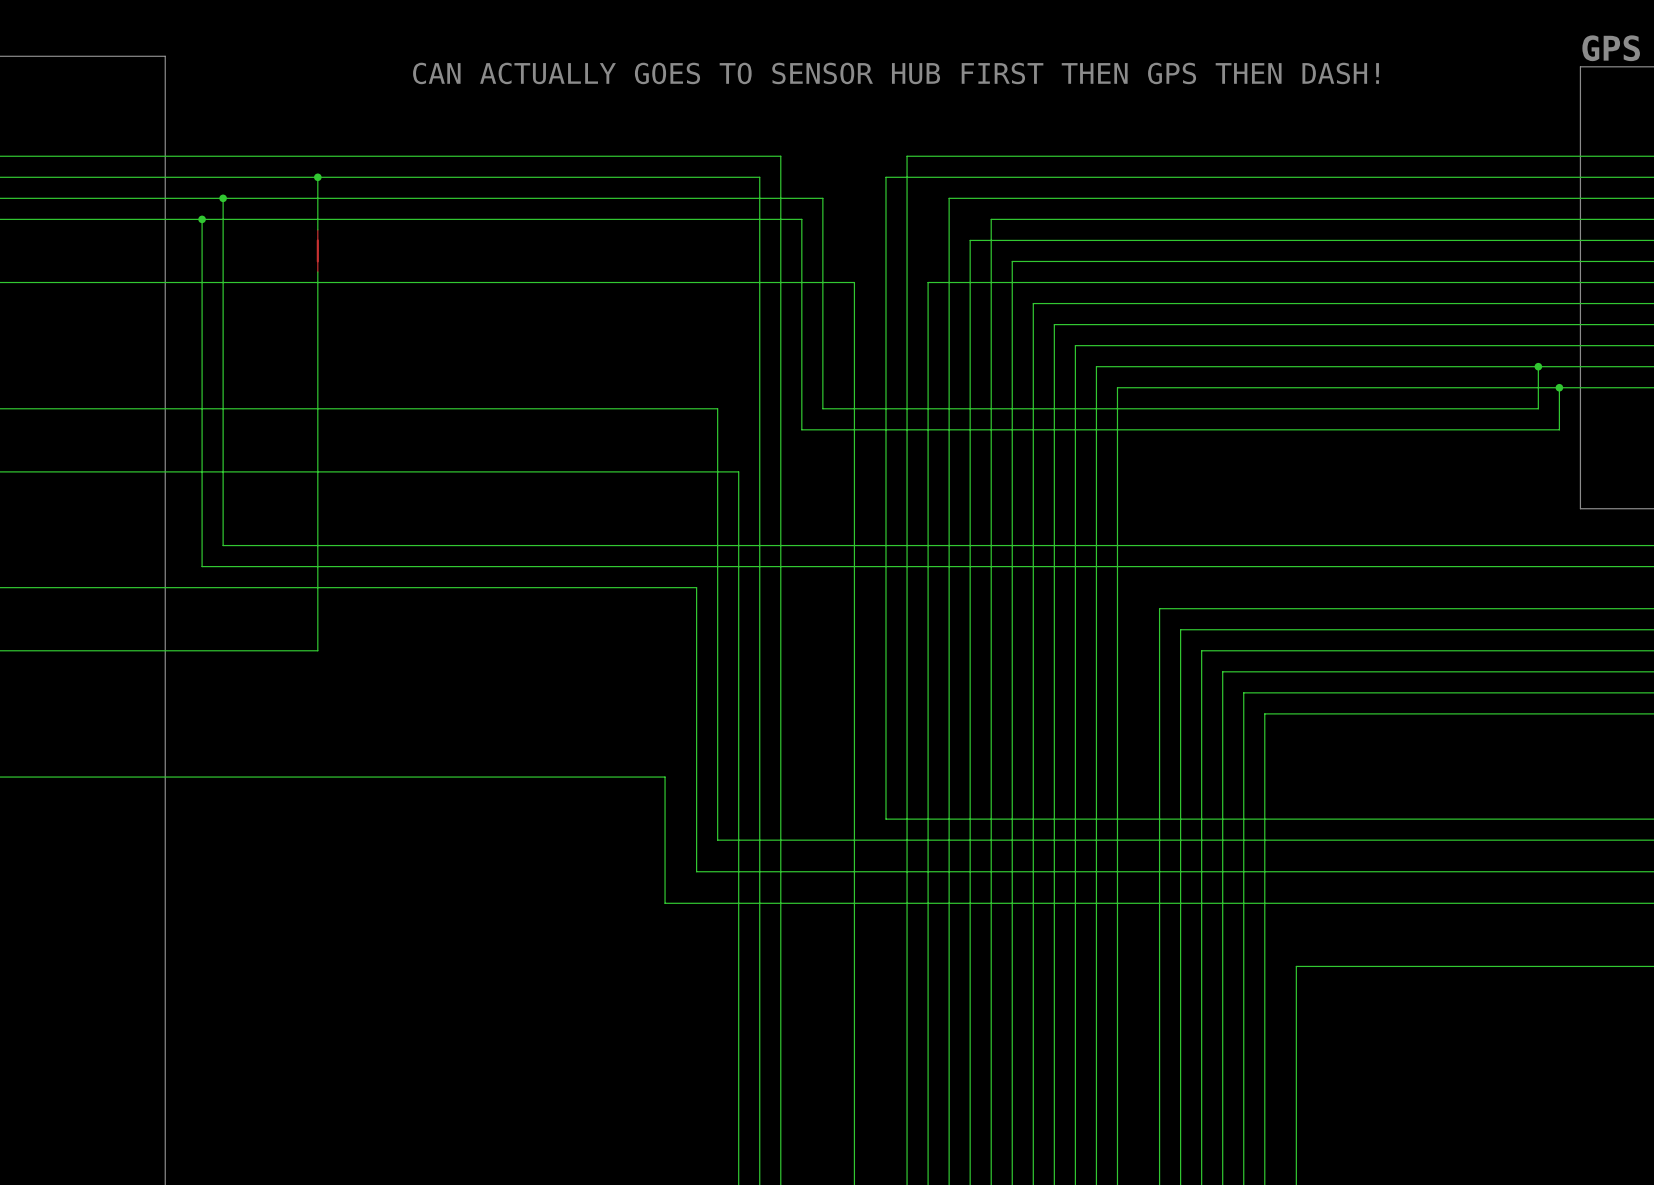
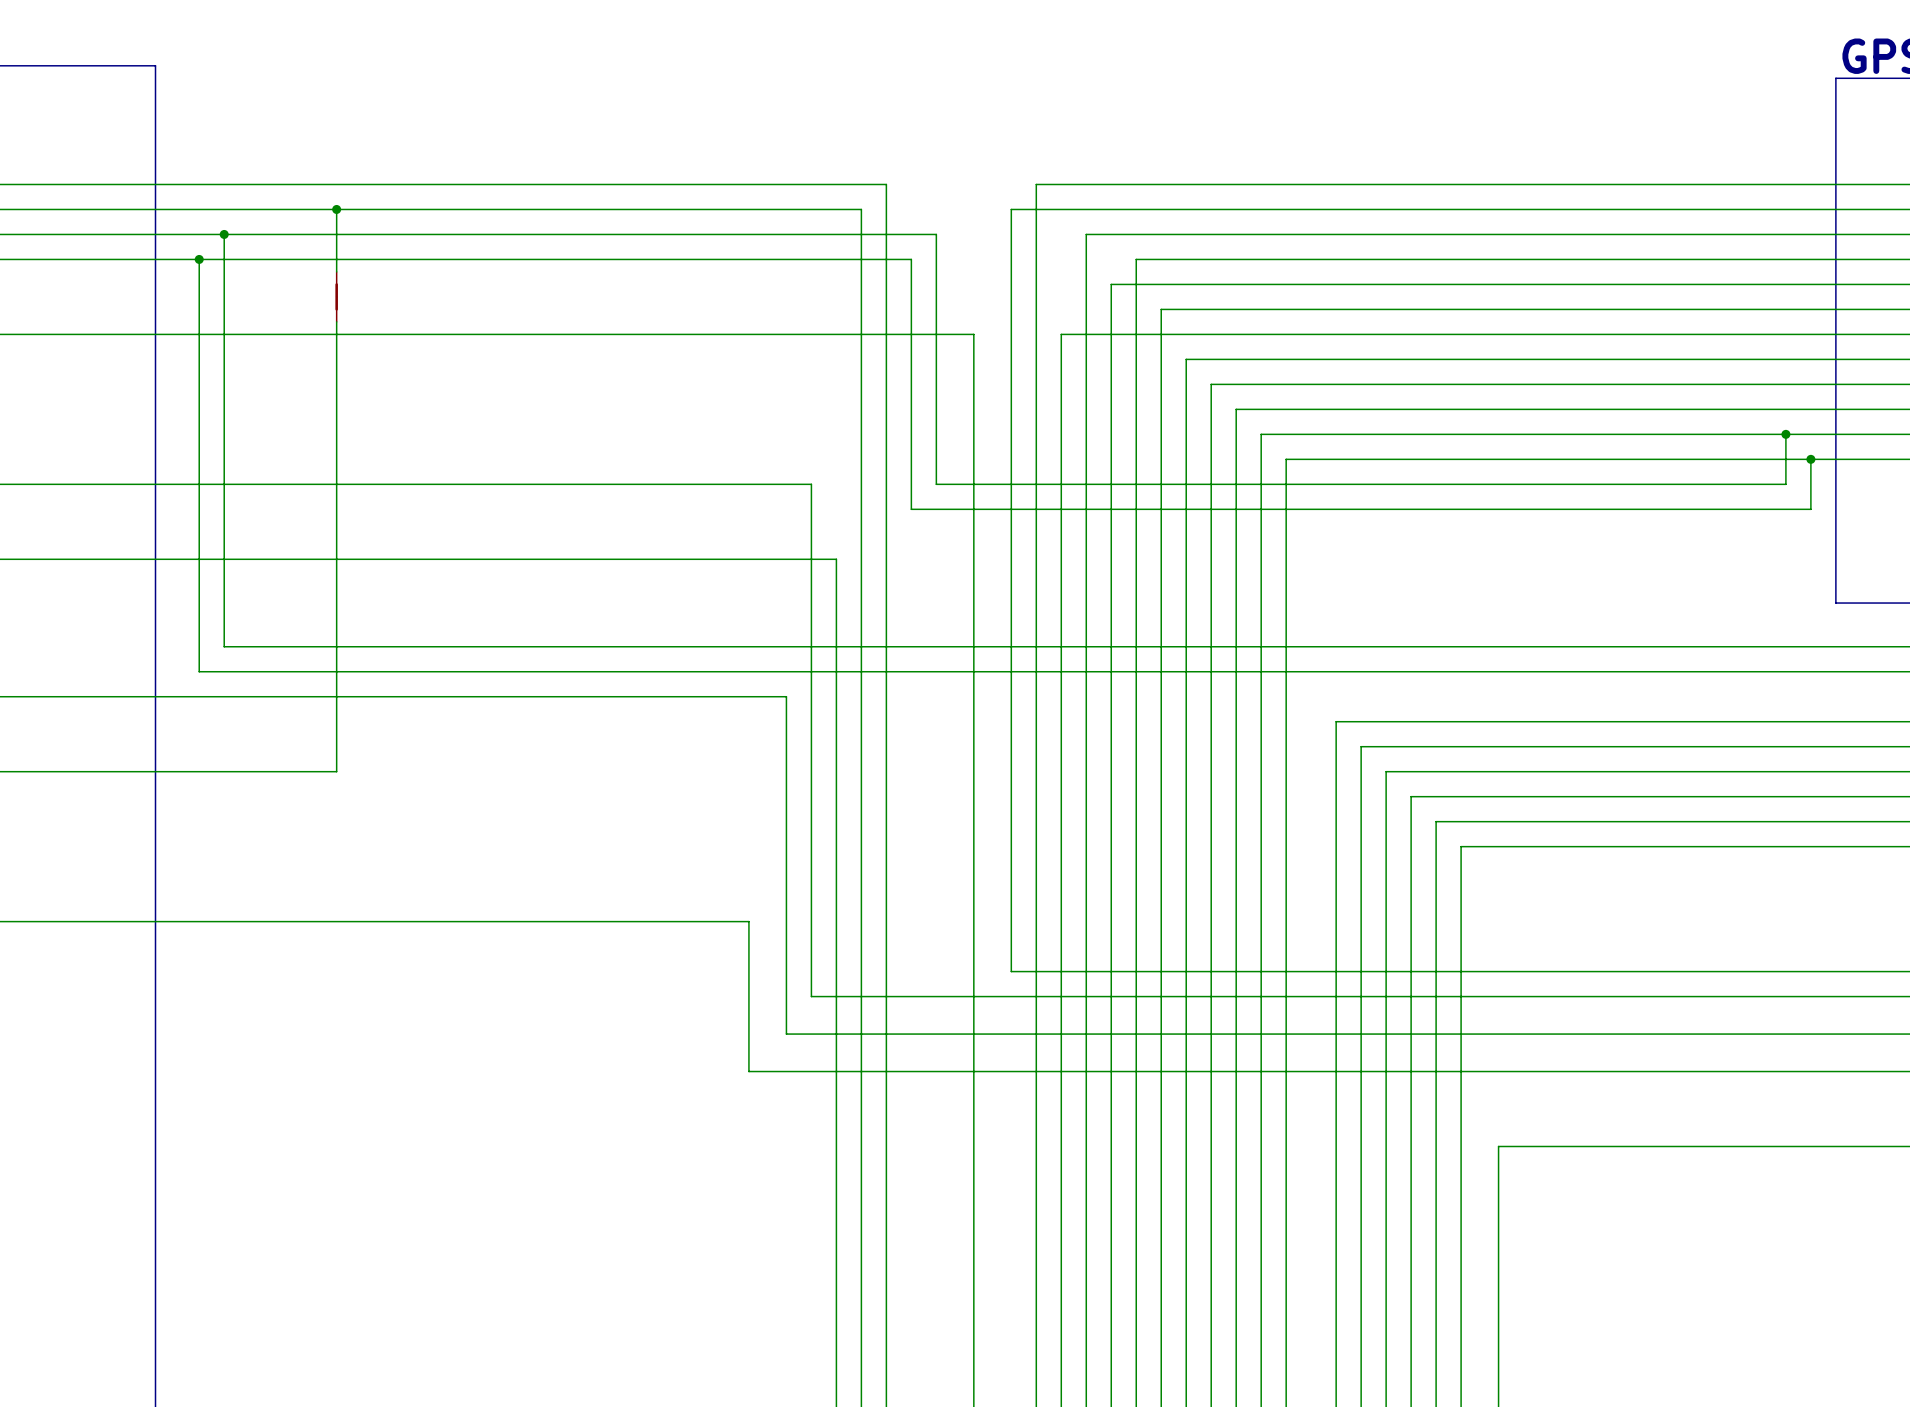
text: CAN ACTUALLY GOES TO SENSOR HUB FIRST THEN GPS THEN DASH! (896, 73) -> none

